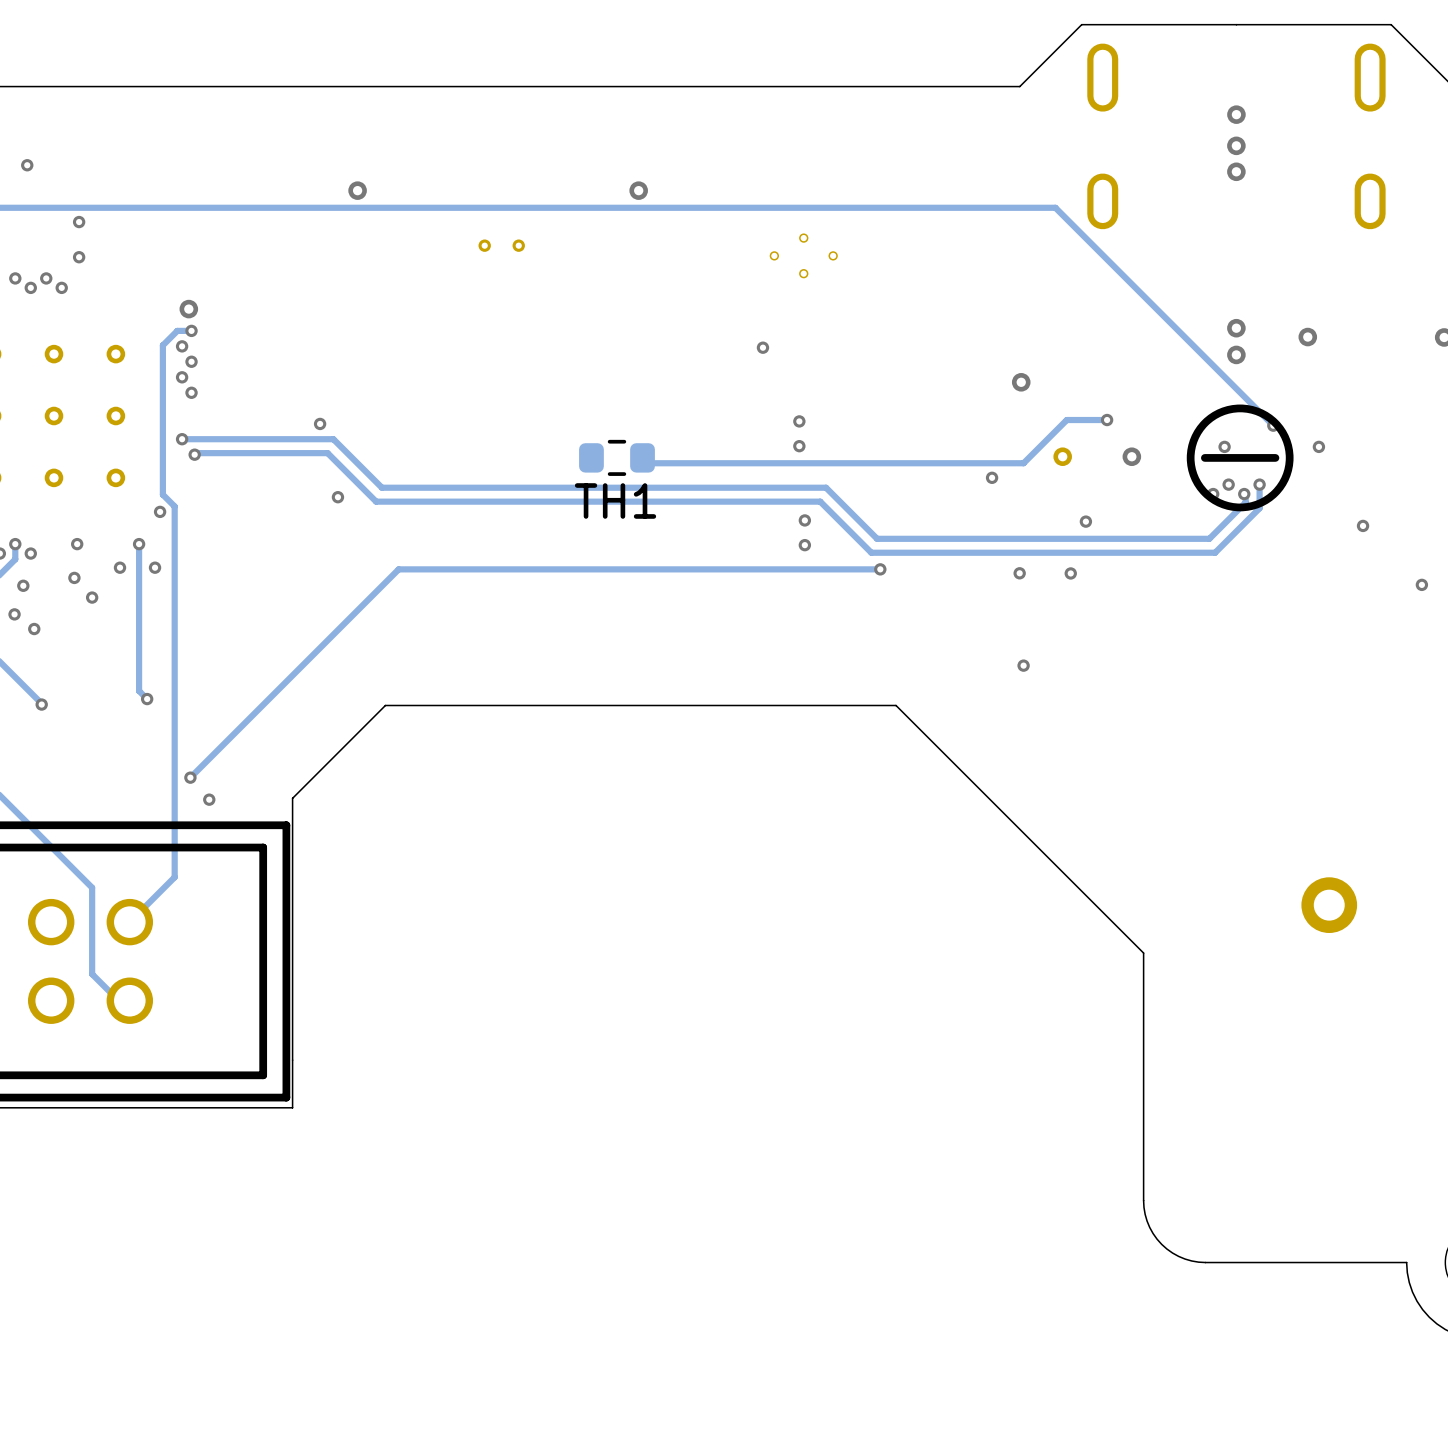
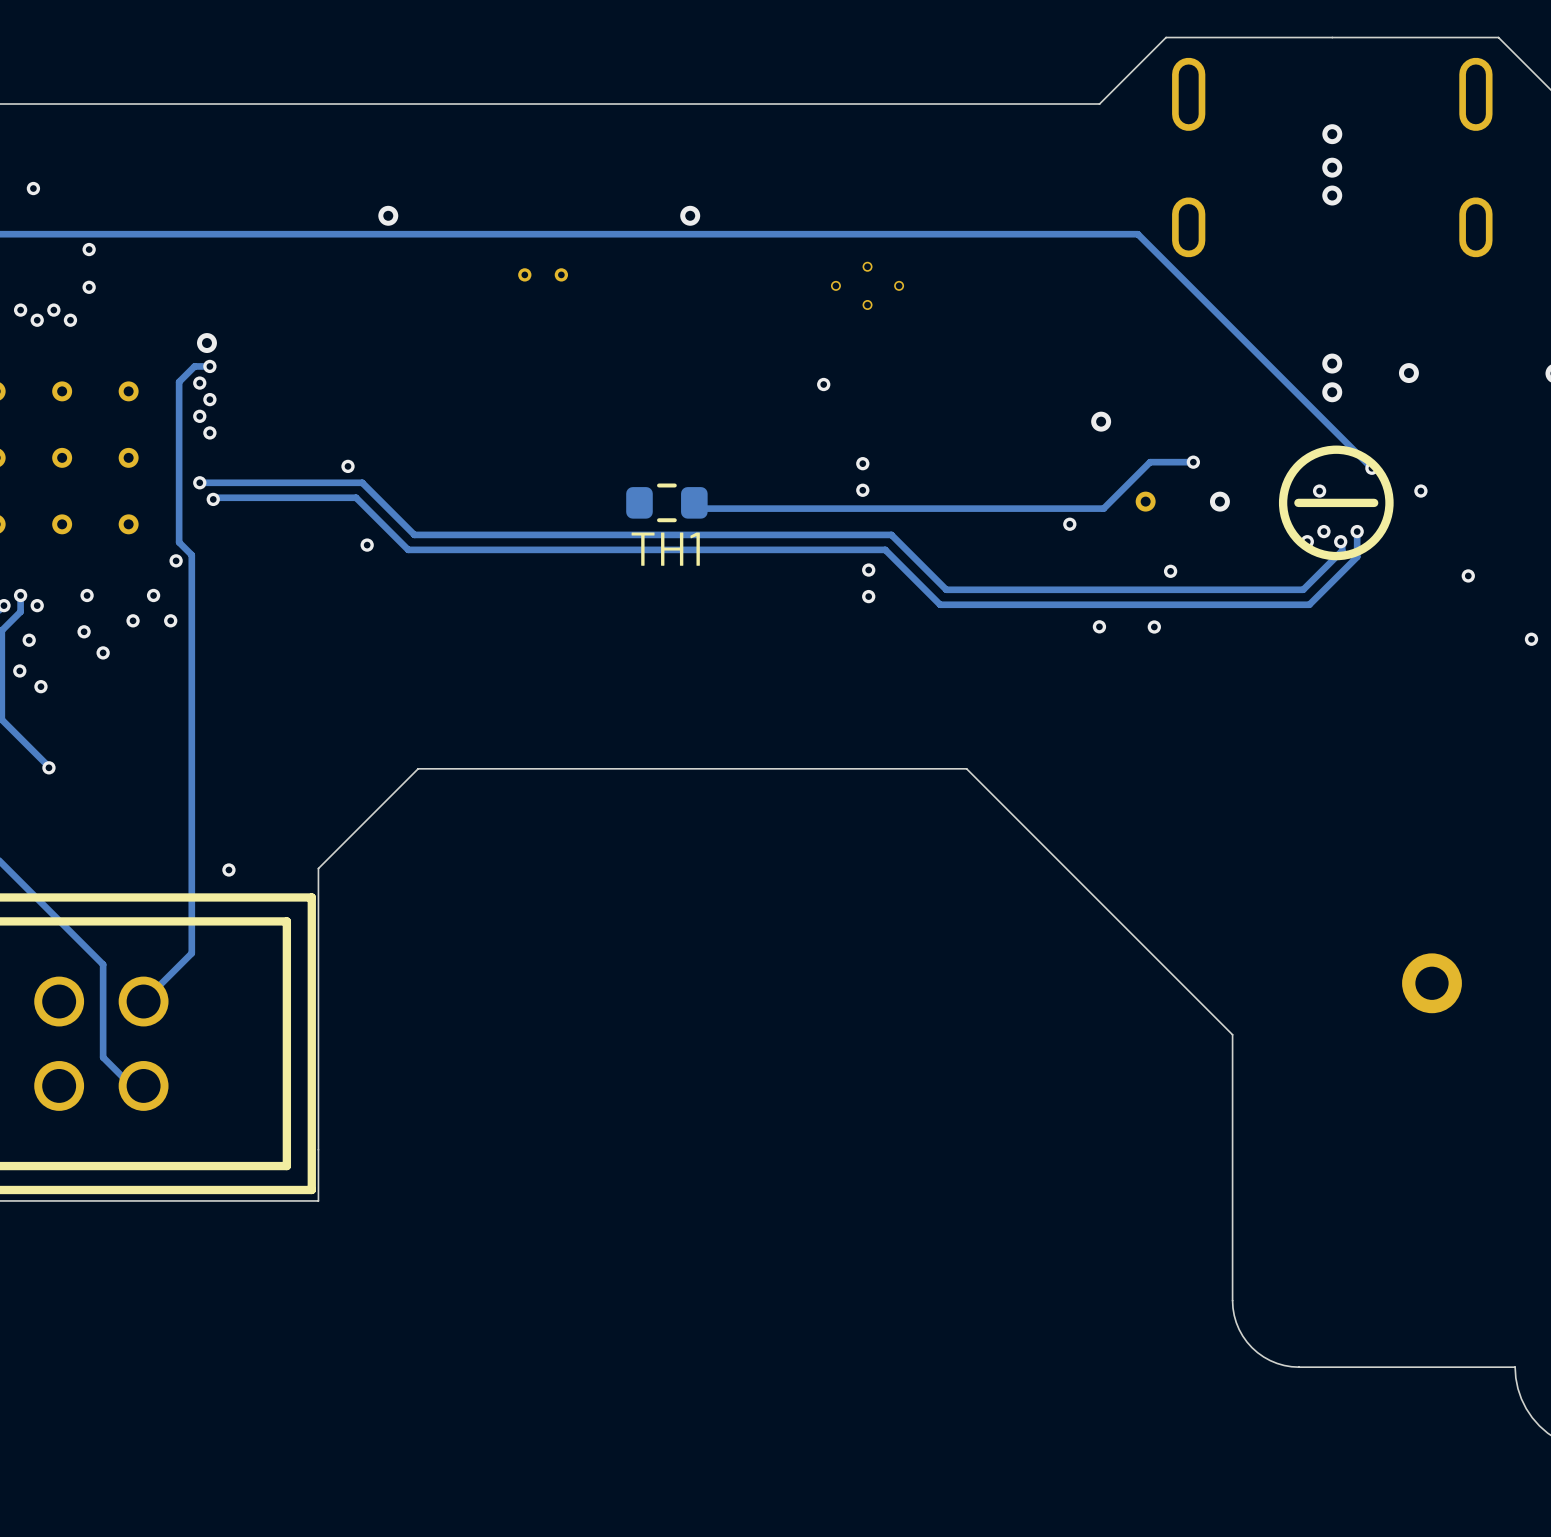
track: (139, 544) (139, 690) (147, 699) -> none
track: (880, 569) (398, 569) (190, 777) -> none
via: (880, 569) -> none
via: (1023, 665) -> none
via: (147, 699) -> none
via: (190, 777) -> none

